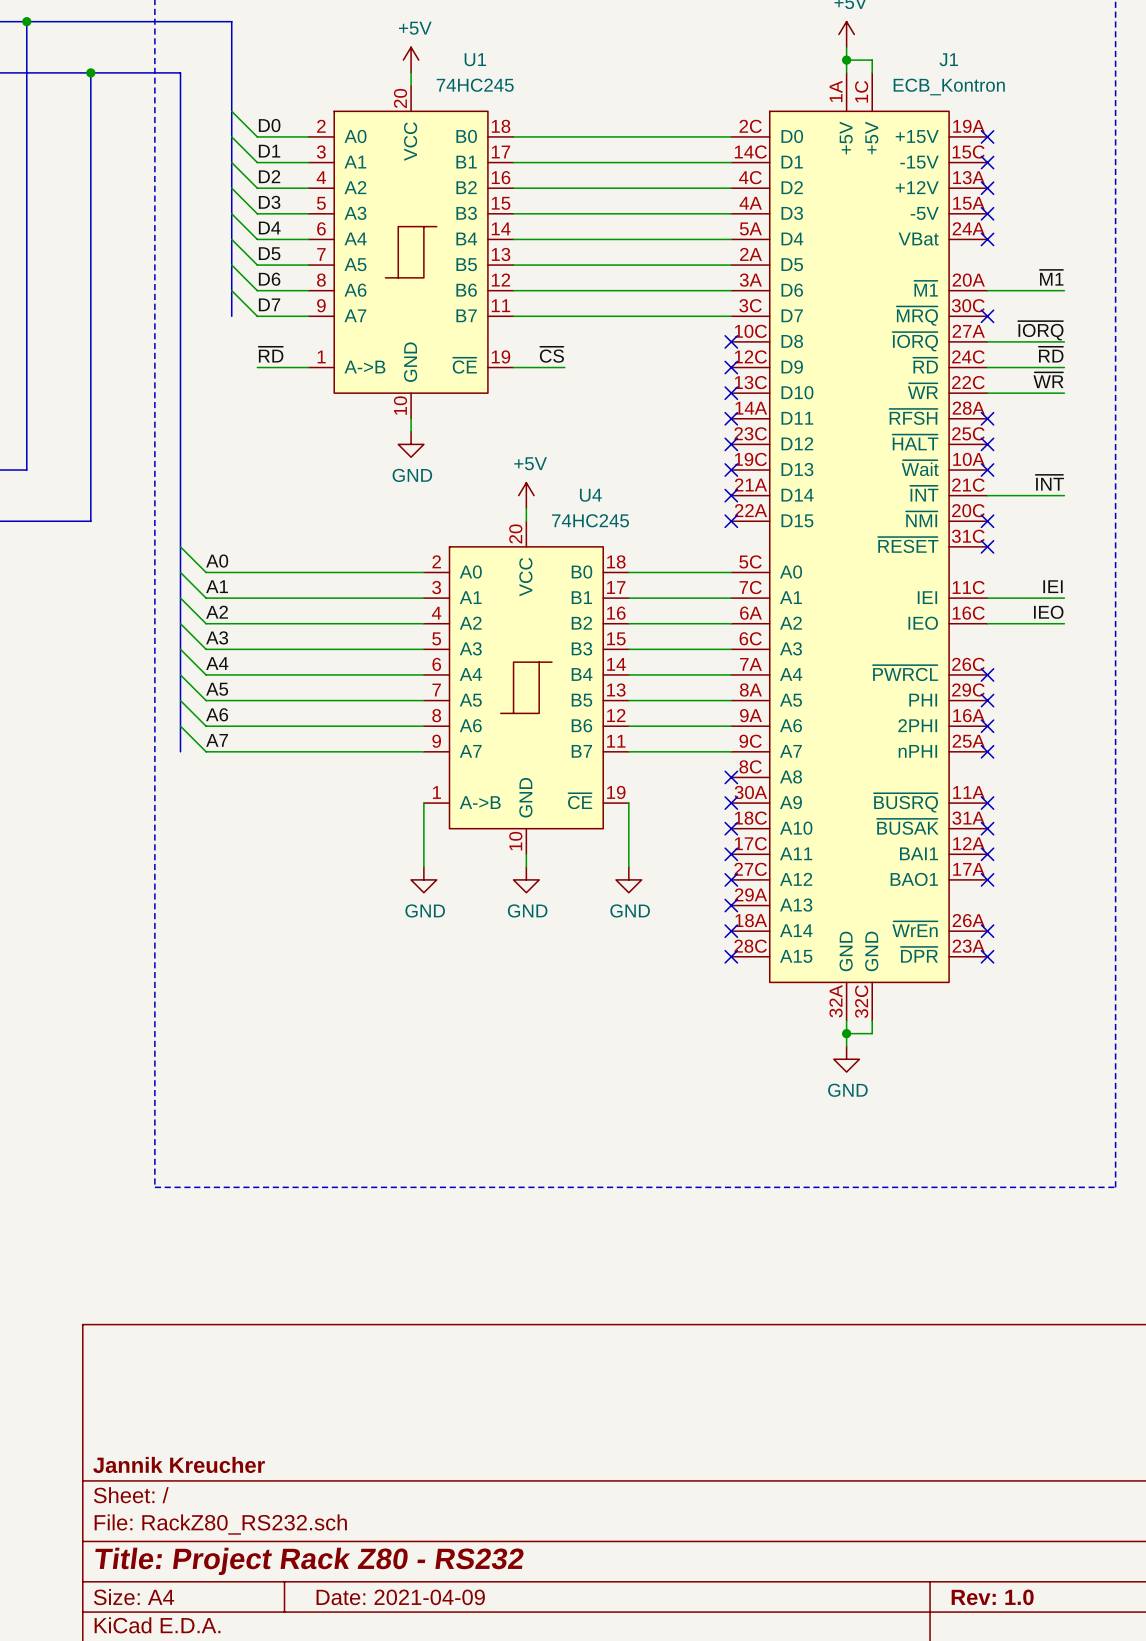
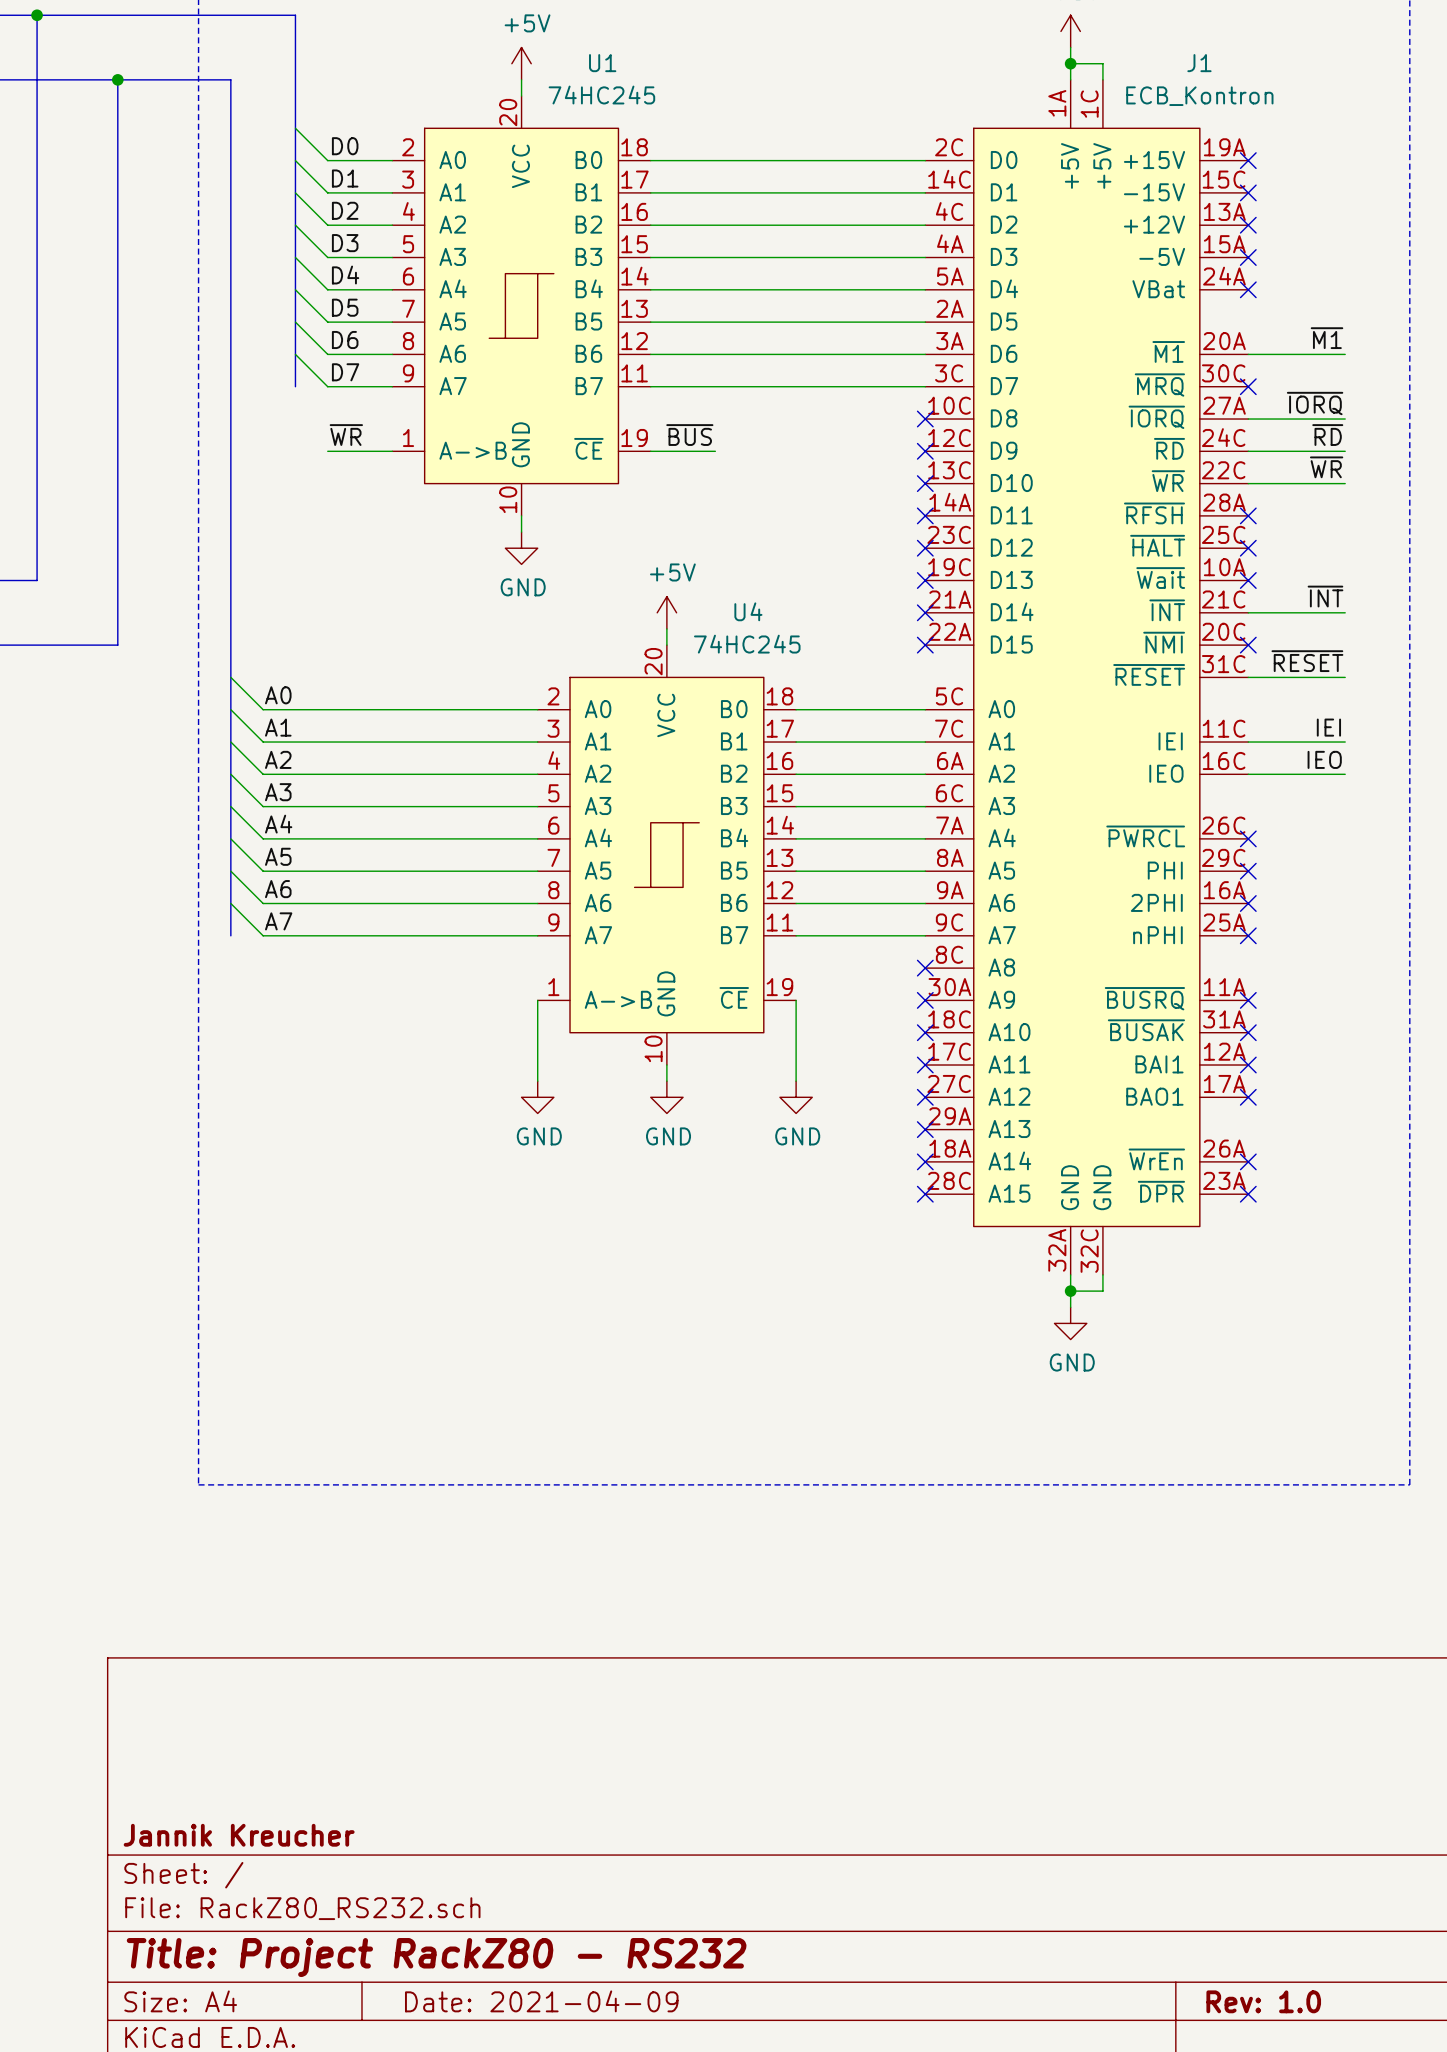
label: ~{RD} (270, 354) -> ~{WR} (346, 435)
label: ~{CS} (551, 354) -> ~{BUS} (689, 435)
label: none -> ~{RESET} (1307, 661)
wire: none -> (1248, 677) (1345, 677)
no-connect mark: (987, 546) -> none
title block: Title: Project Rack Z80 - RS232 (309, 1561) -> Title: Project RackZ80 - RS232 (436, 1957)

